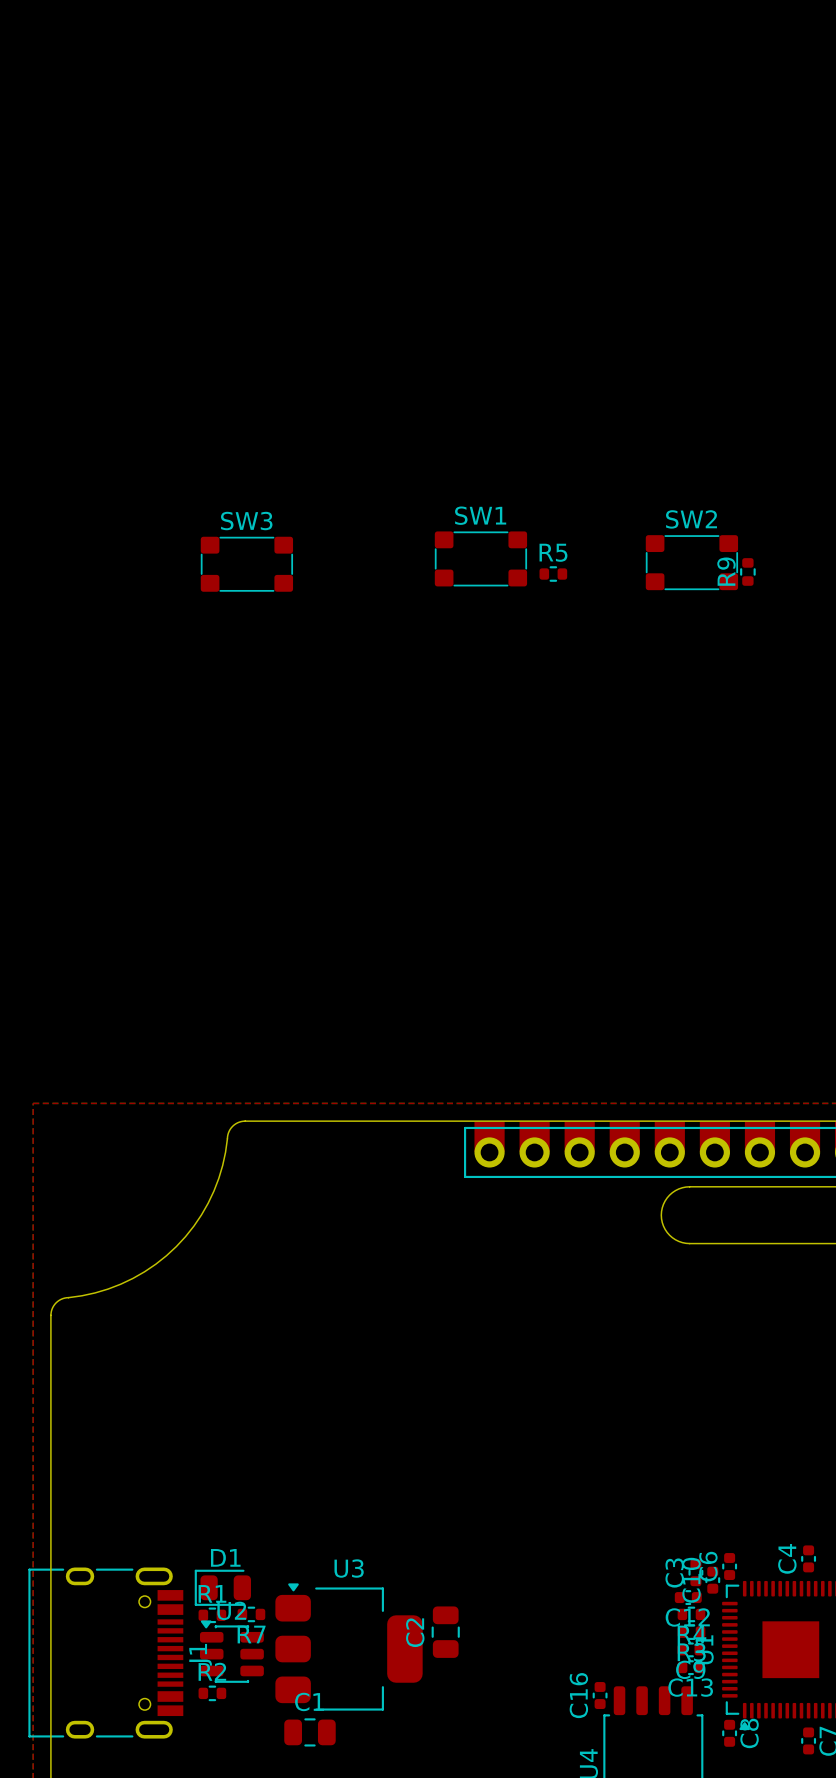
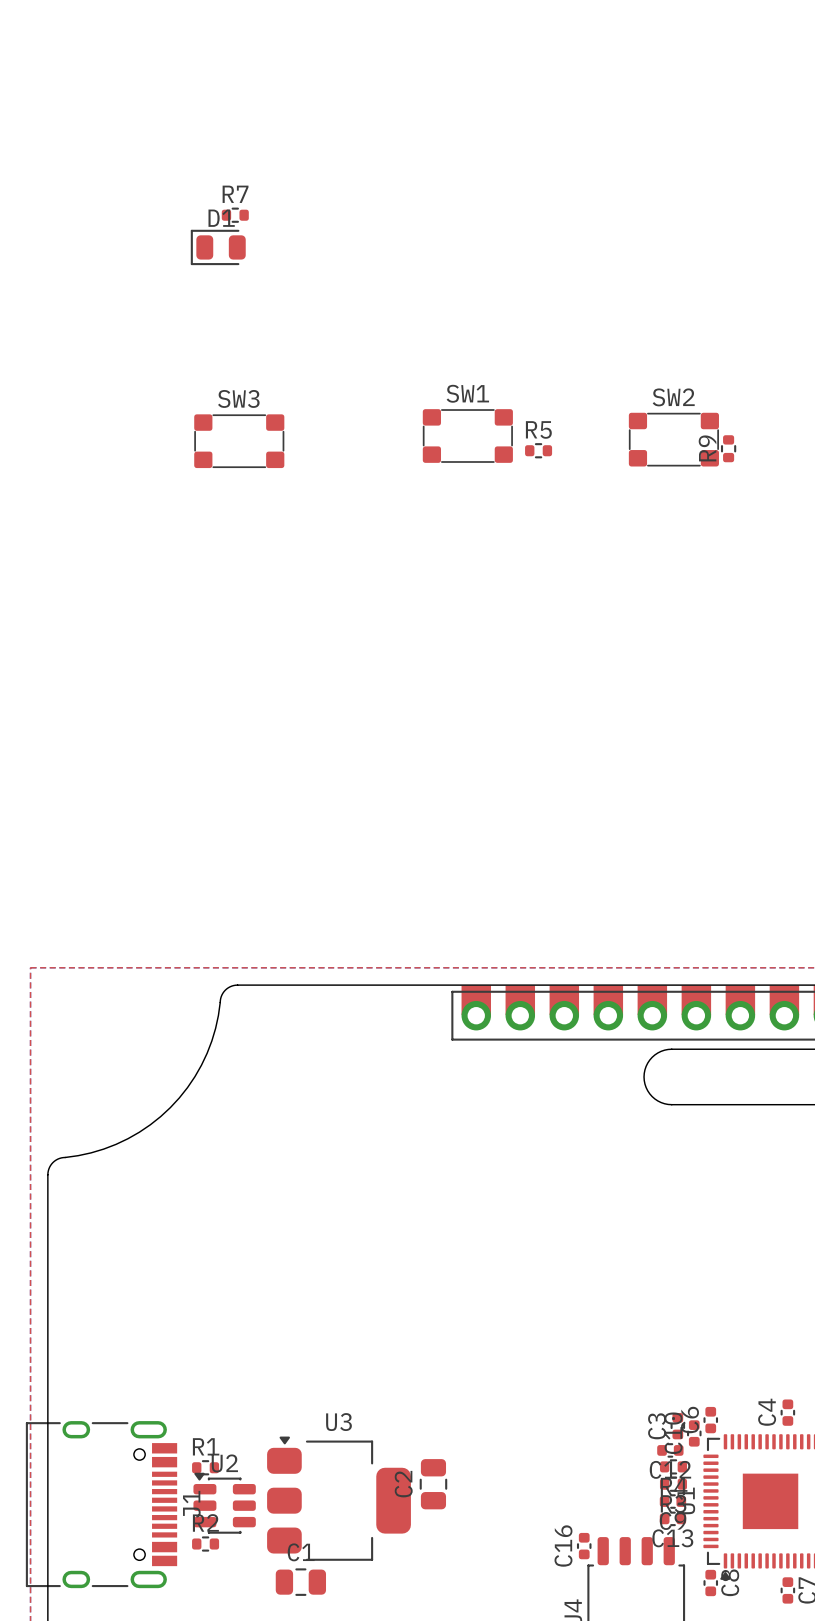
D1 position: (222, 1587) -> (218, 247)
R7 position: (251, 1614) -> (235, 215)
R7 name position: R7 (251, 1634) -> R7 (235, 194)

